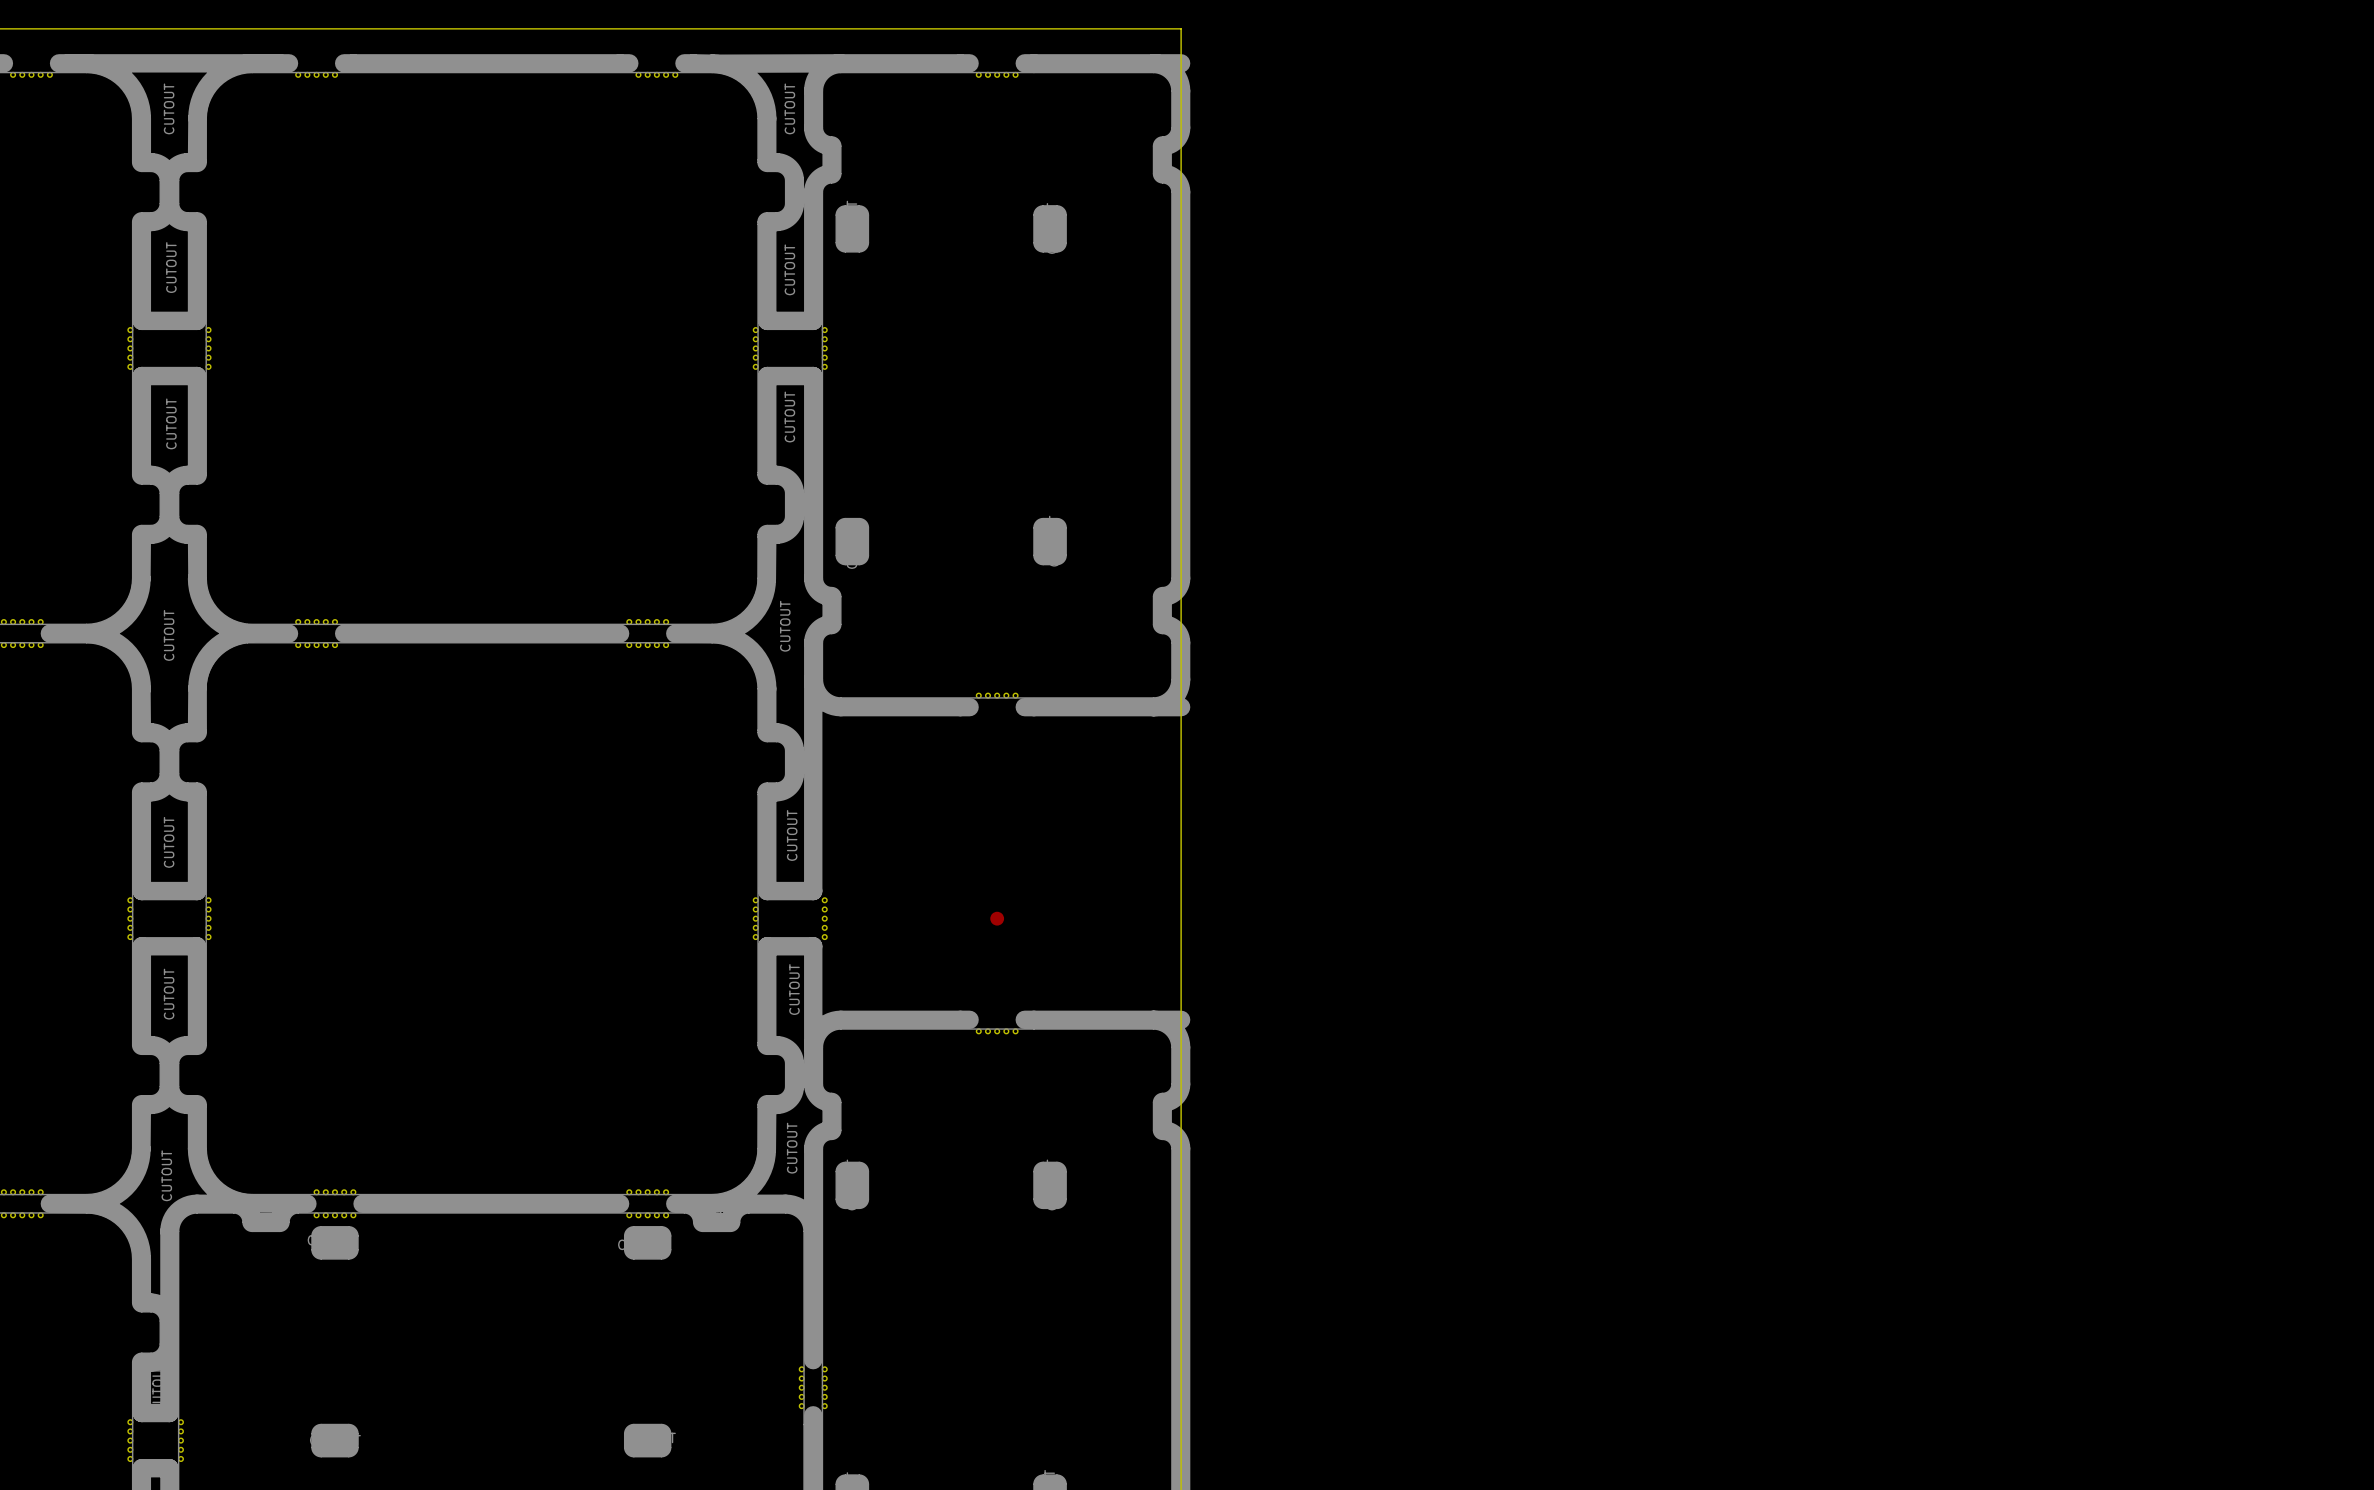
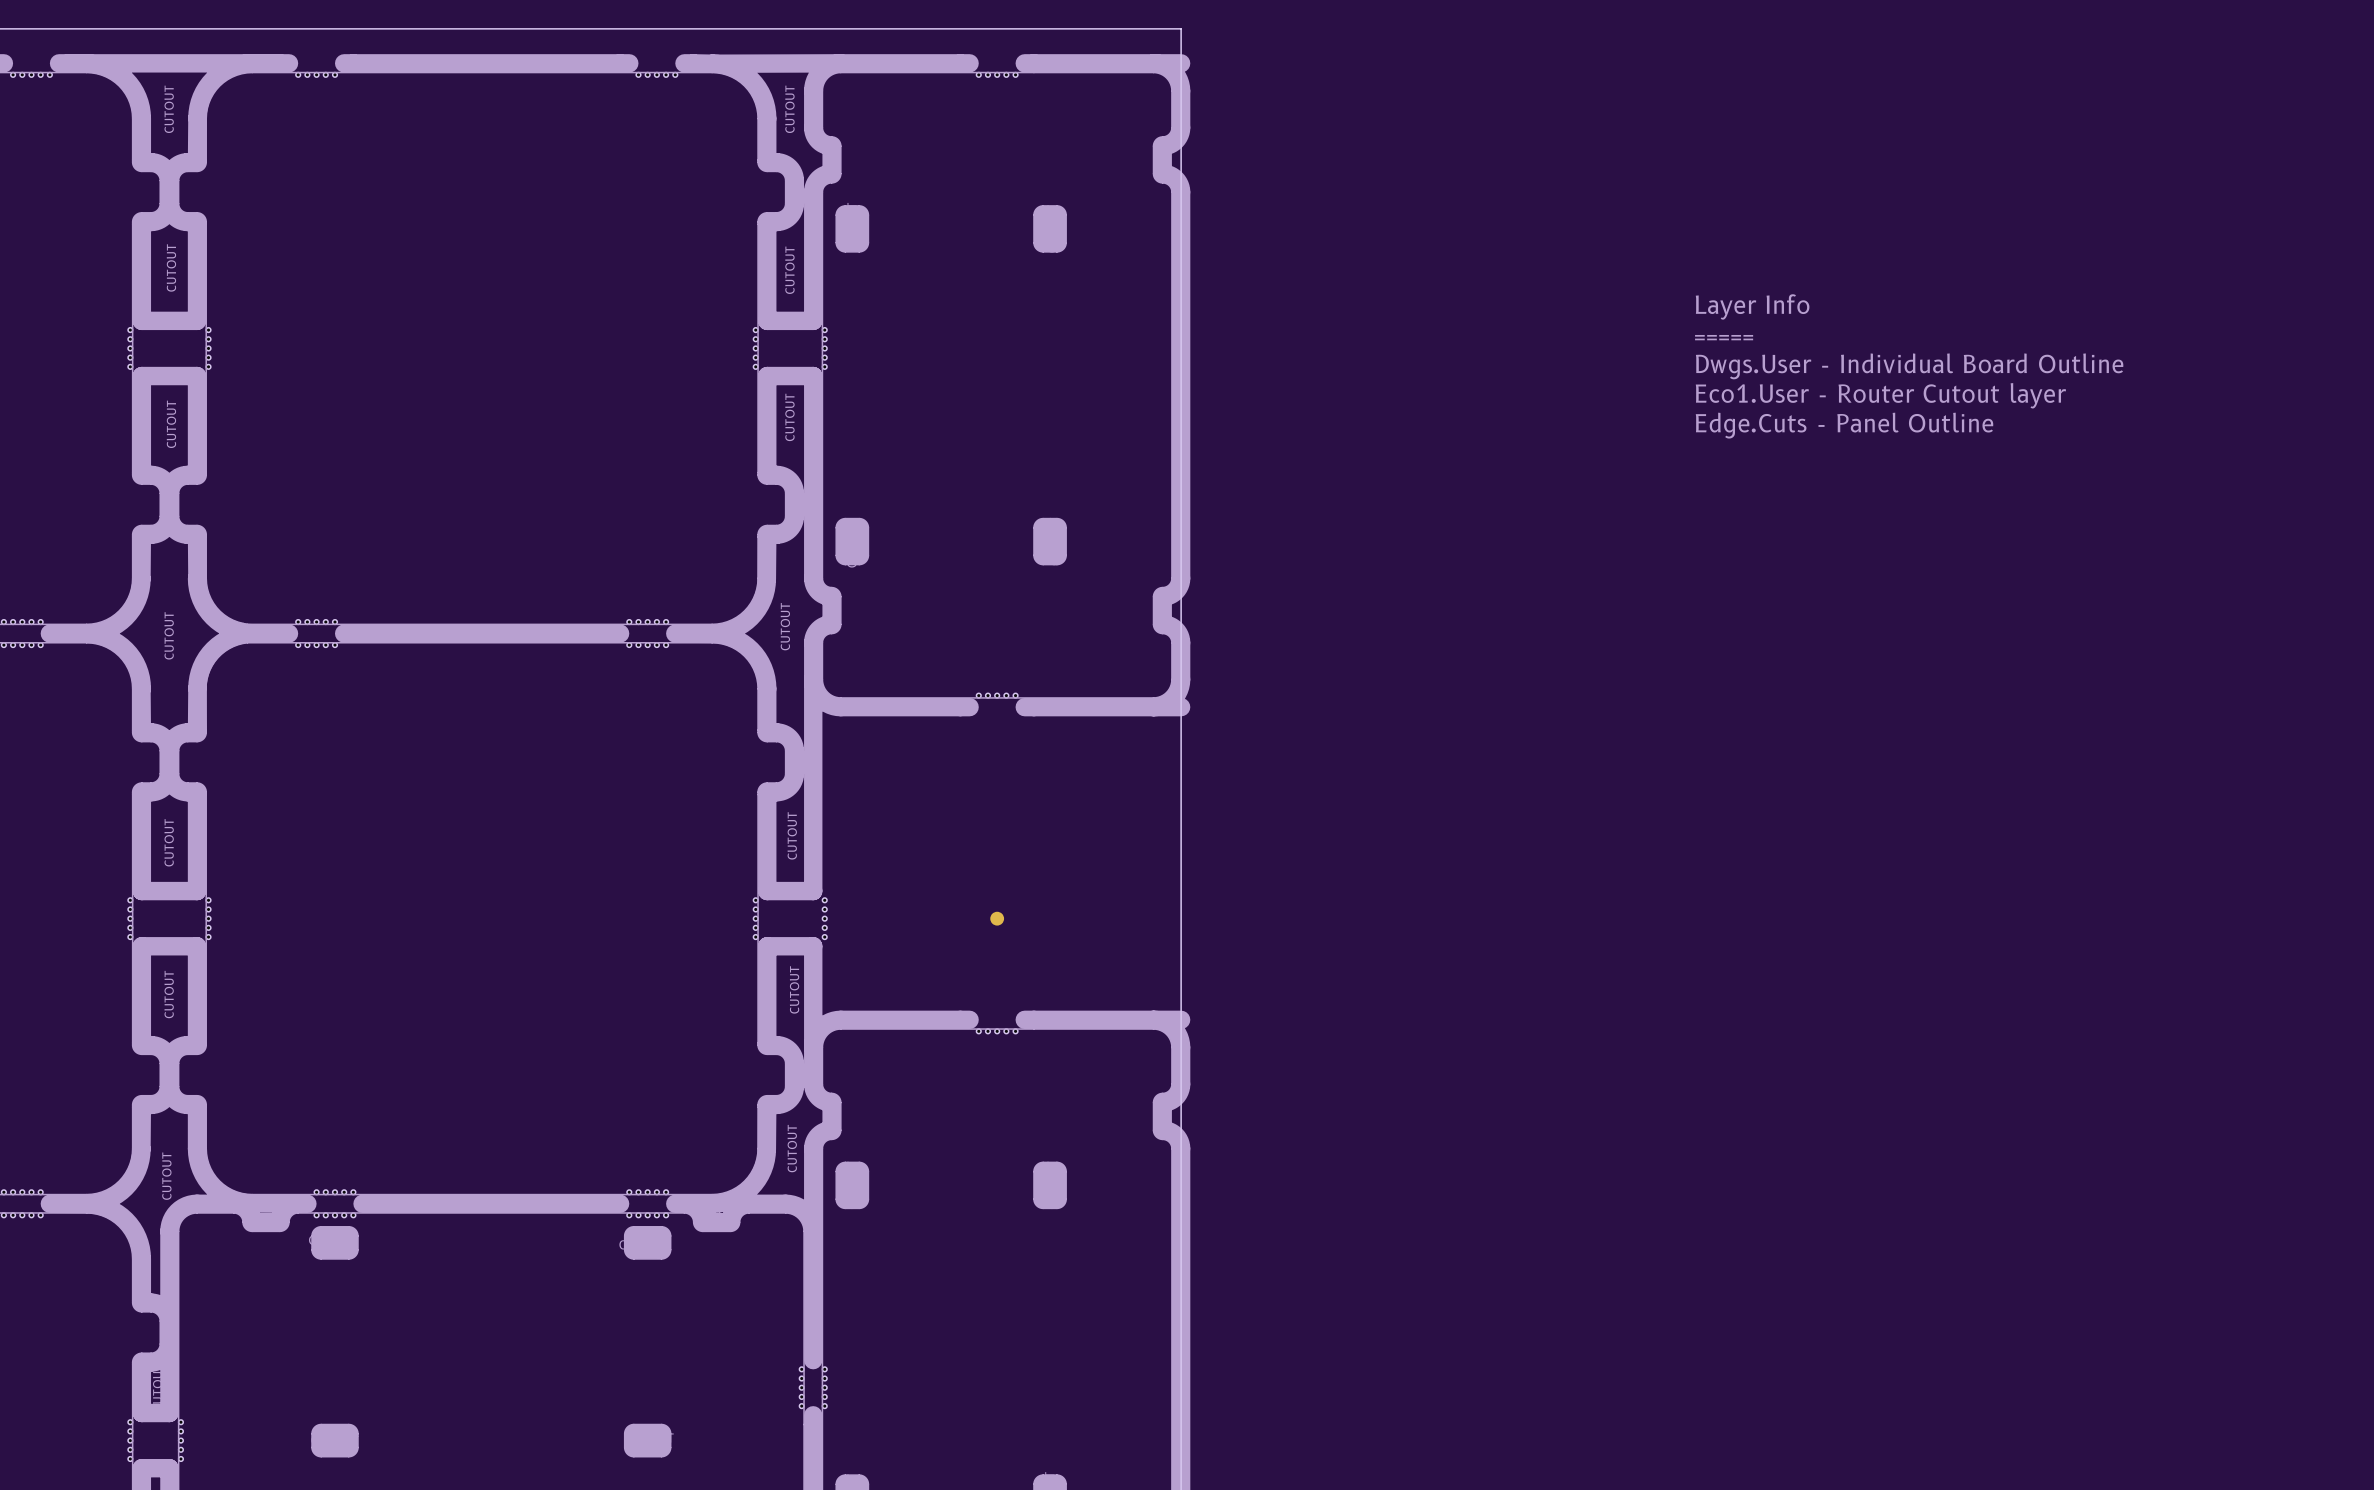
text: none -> Layer Info (1752, 306)
text: none -> ===== (1724, 337)
text: none -> Dwgs.User - Individual Board Outline (1909, 366)
text: none -> Eco1.User - Router Cutout layer (1880, 395)
text: none -> Edge.Cuts - Panel Outline (1844, 425)

